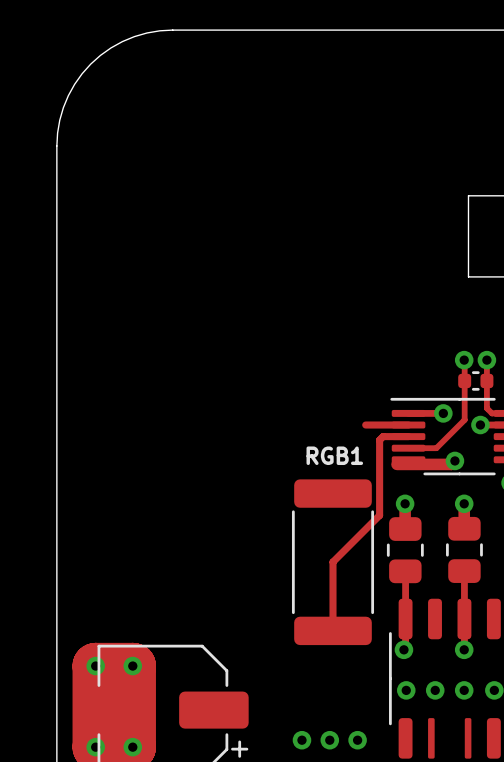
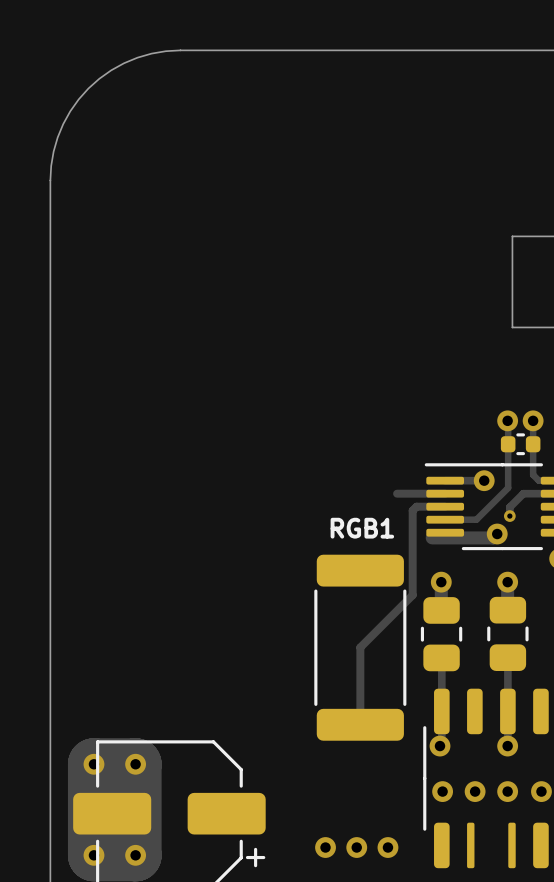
track: none -> (525, 493) (523, 493) (509, 507) (509, 516)
via: (480, 425) -> none
via: none -> (509, 516)

